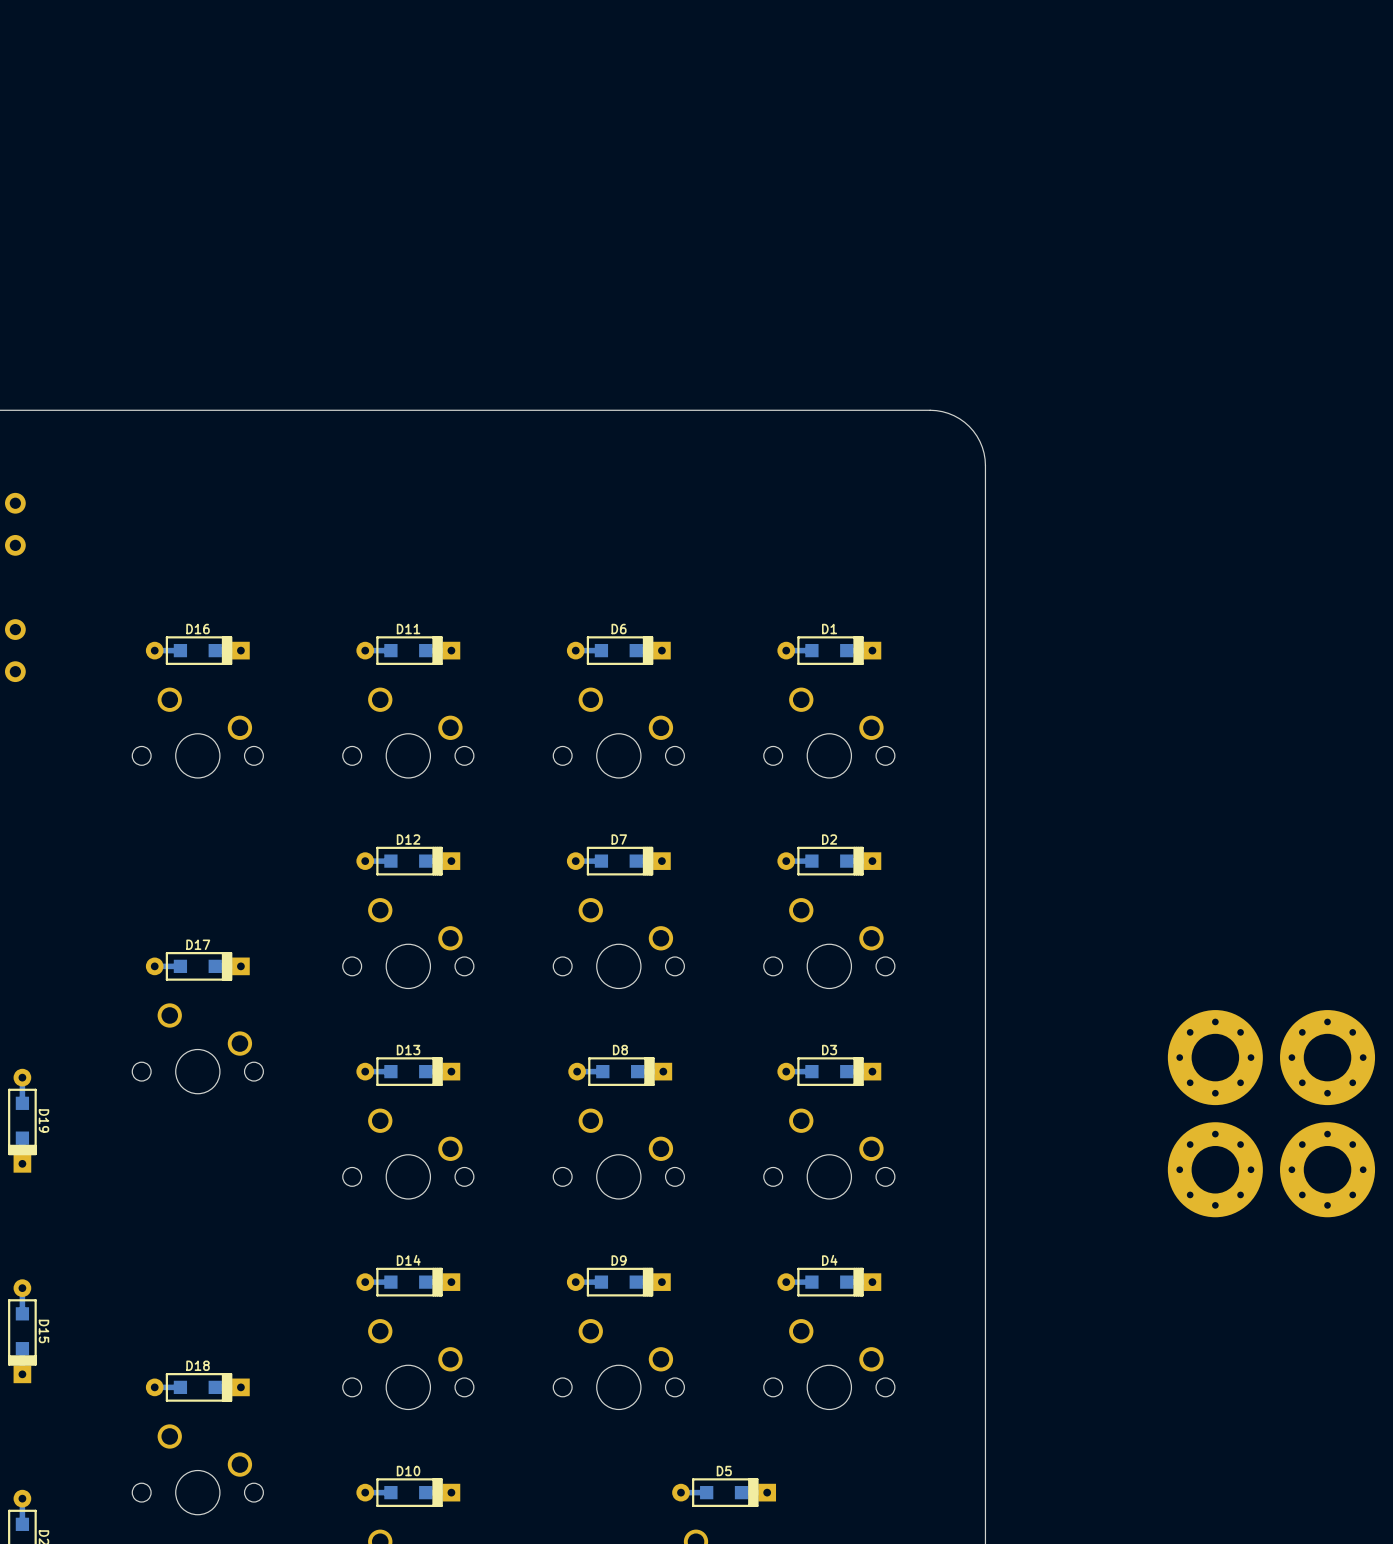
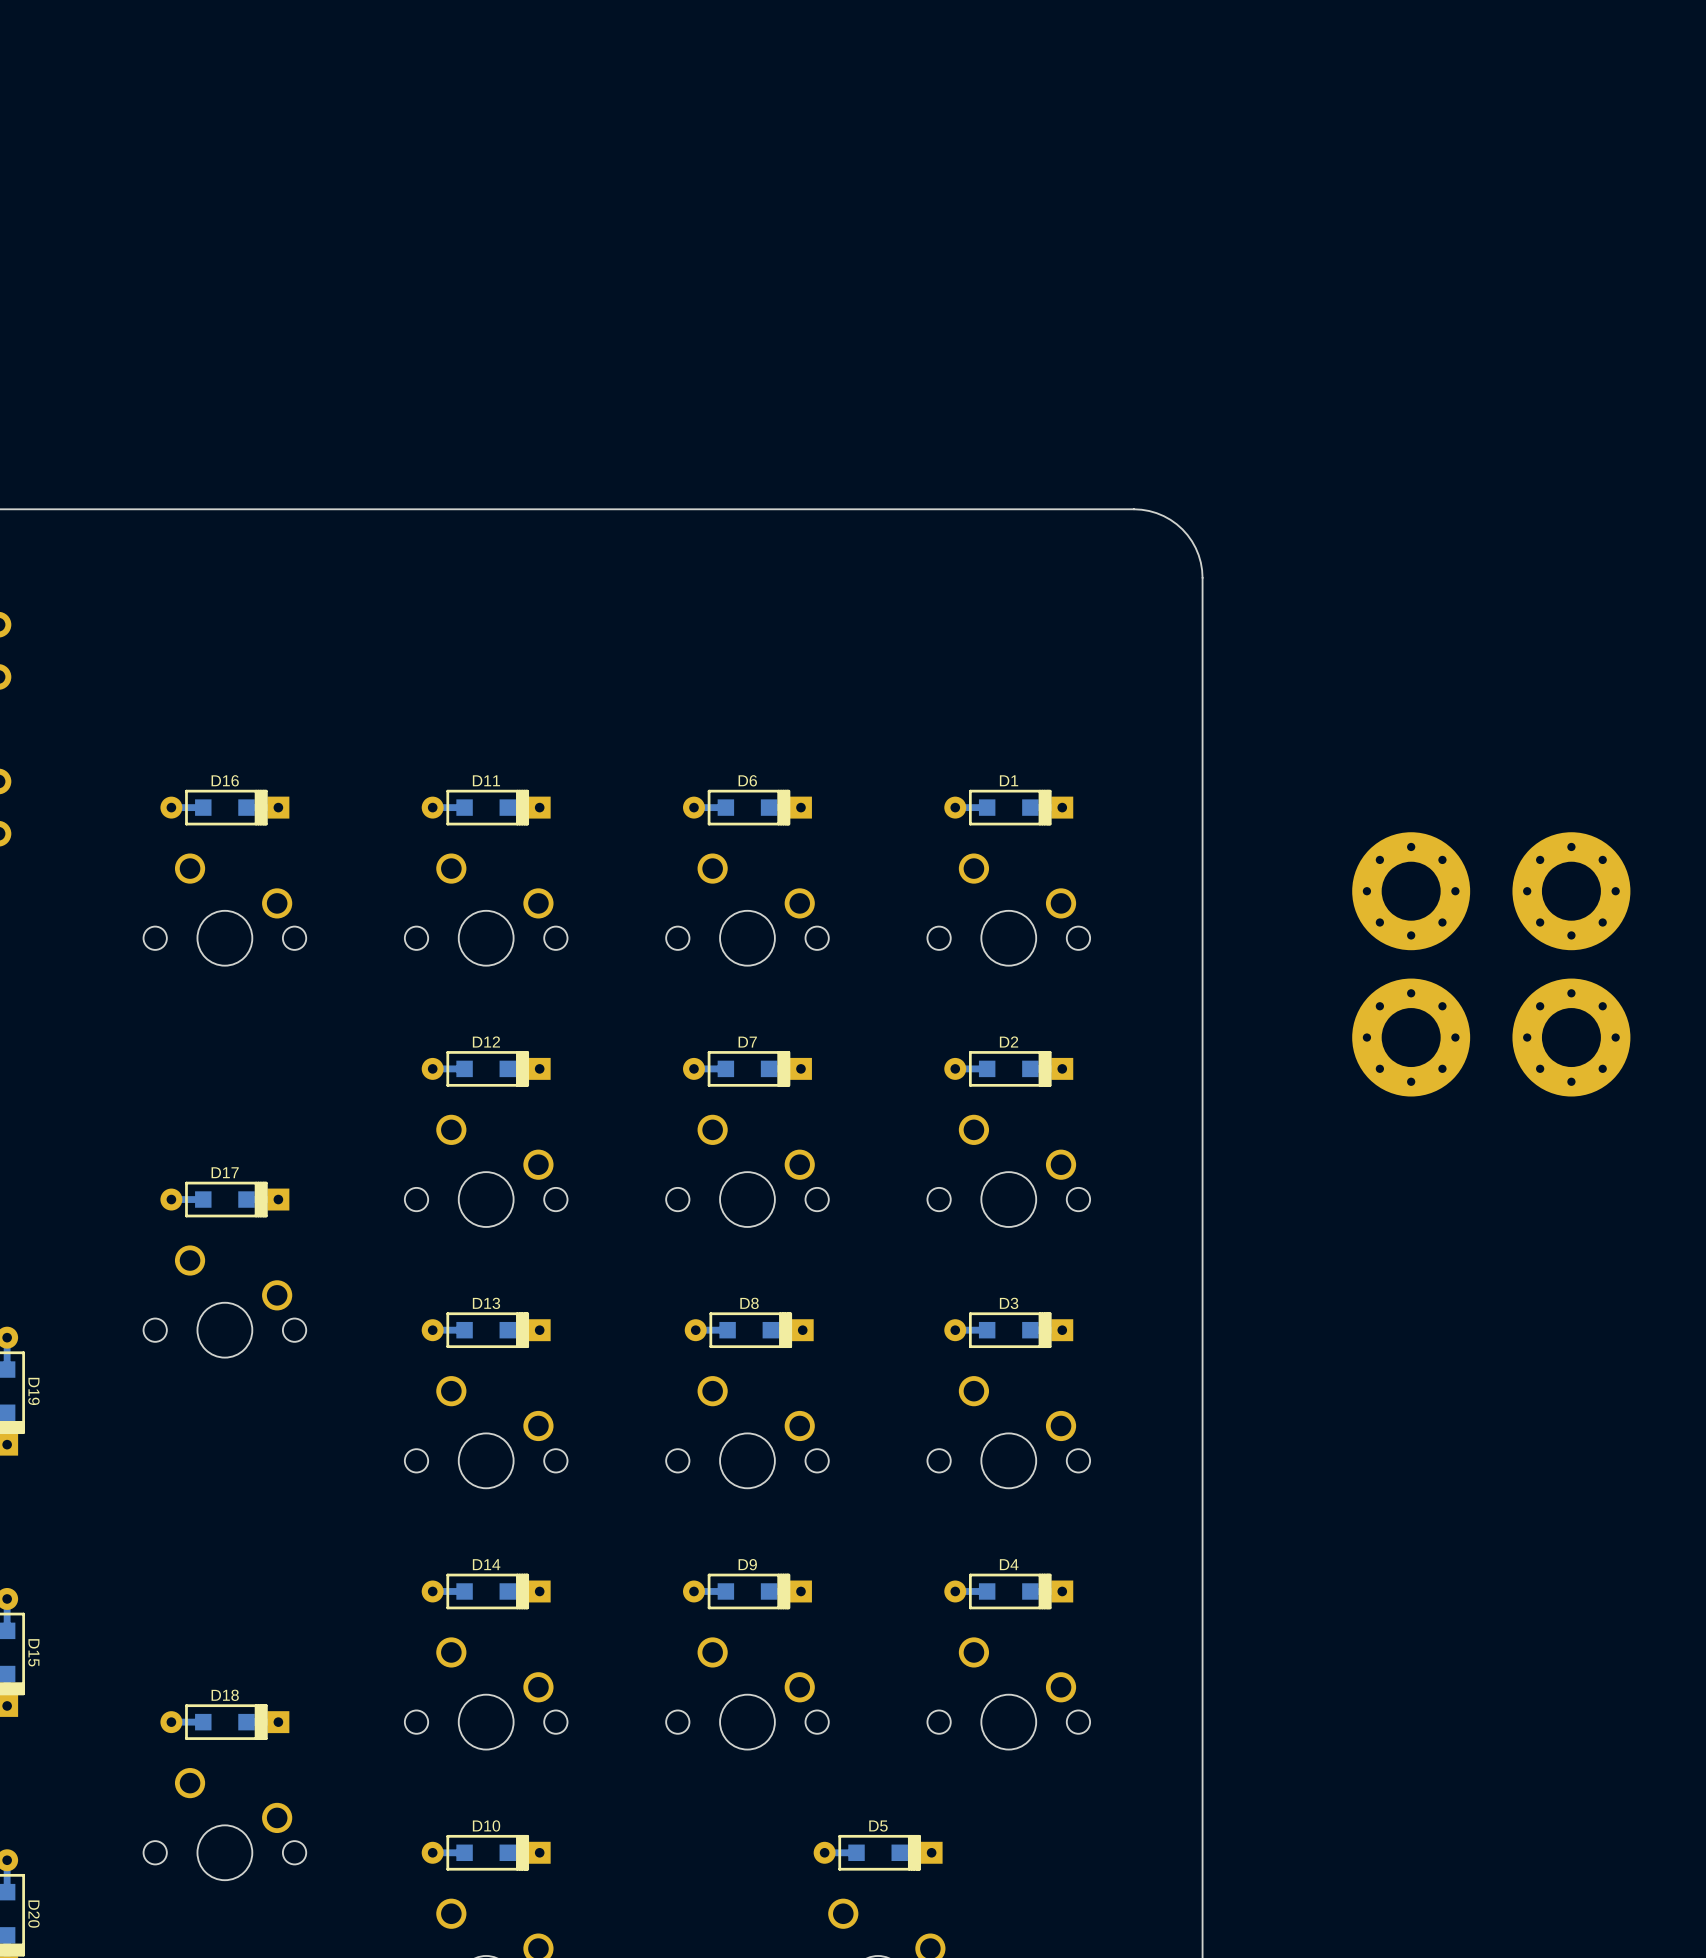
part: none -> (1411, 891)
part: none -> (1571, 891)
part: none -> (1411, 1037)
part: none -> (1571, 1037)
part: (1215, 1057) -> none
part: (1327, 1057) -> none
part: (1215, 1169) -> none
part: (1327, 1169) -> none

